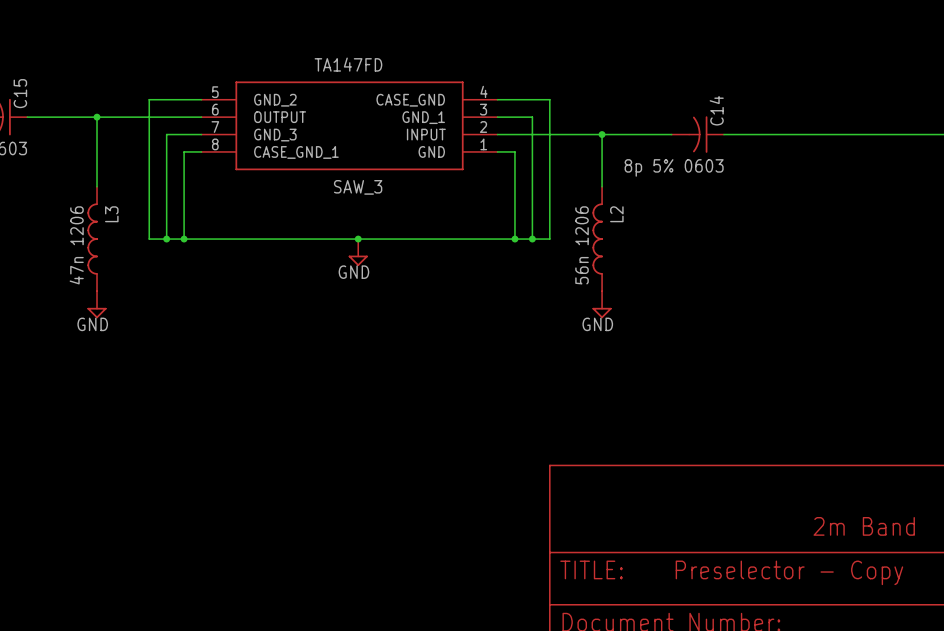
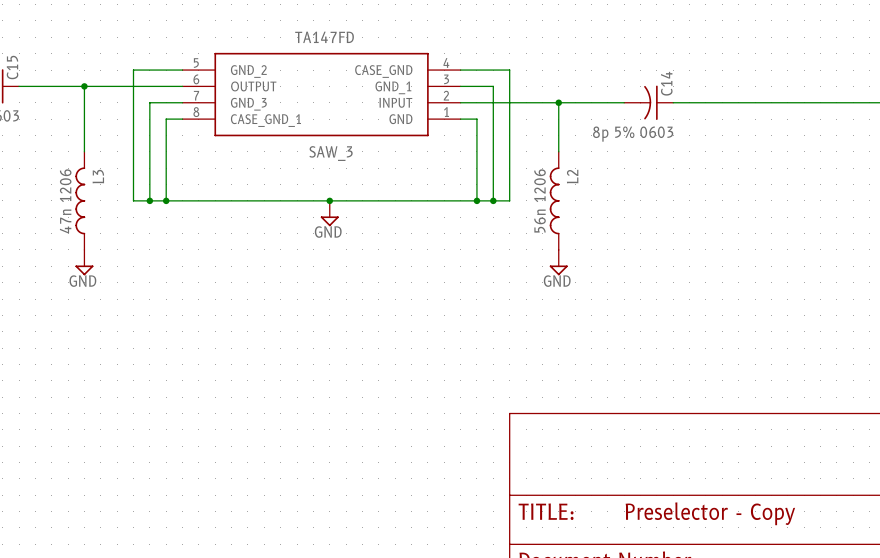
text: 2m Band (864, 526) -> none

